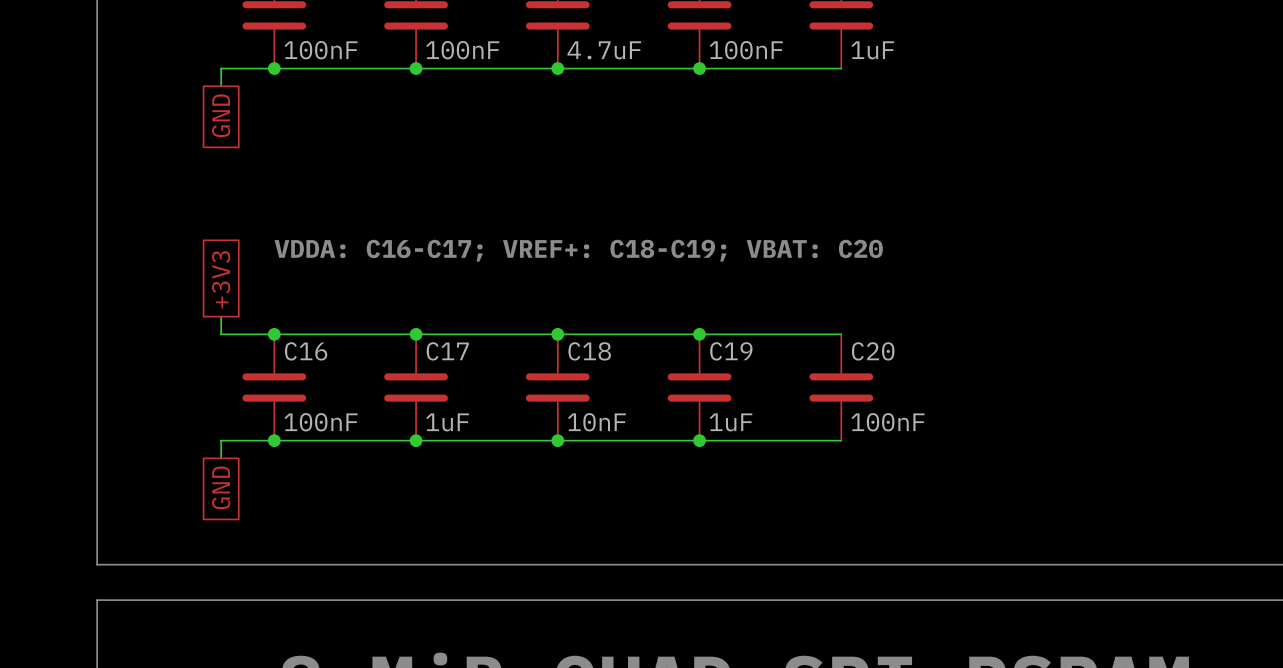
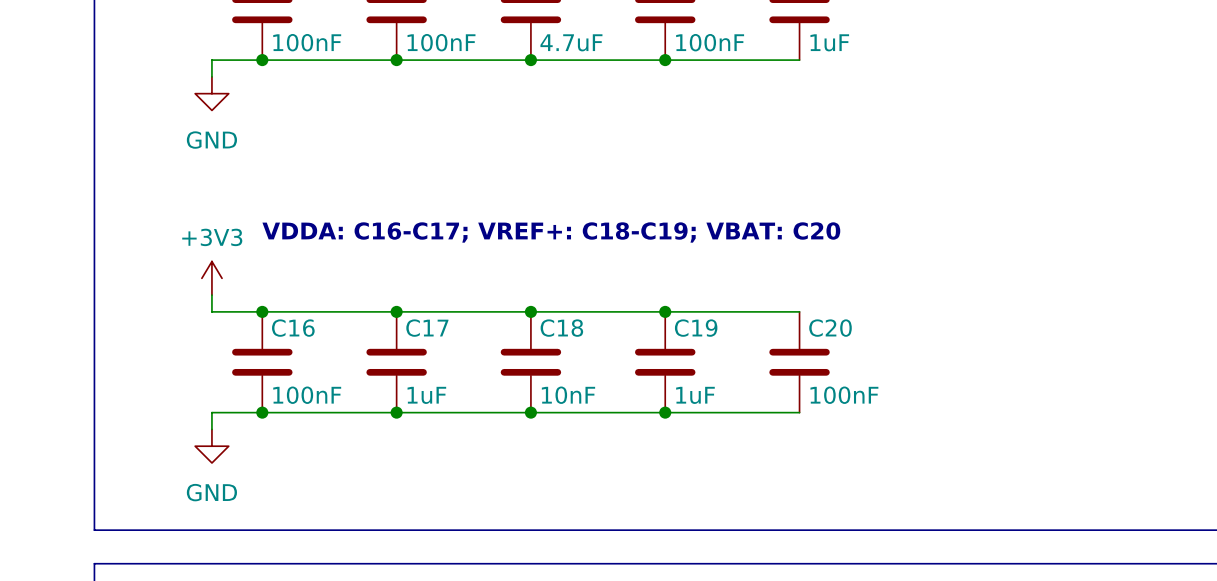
power symbol: none -> GND (211, 93)
global label: GND (221, 115) -> none
global label: +3V3 (221, 279) -> none
power symbol: none -> +3V3 (211, 278)
power symbol: none -> GND (211, 446)
global label: GND (221, 487) -> none

